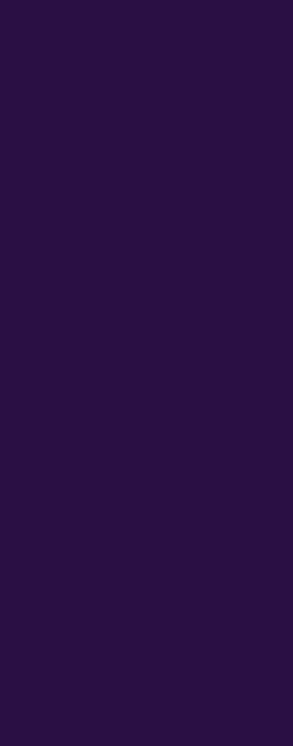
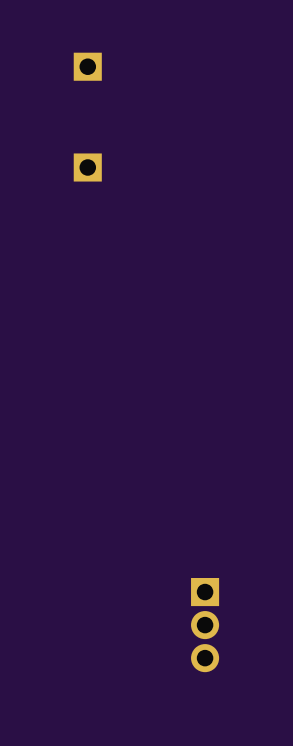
part: none -> (87, 66)
part: none -> (87, 167)
part: none -> (205, 625)

